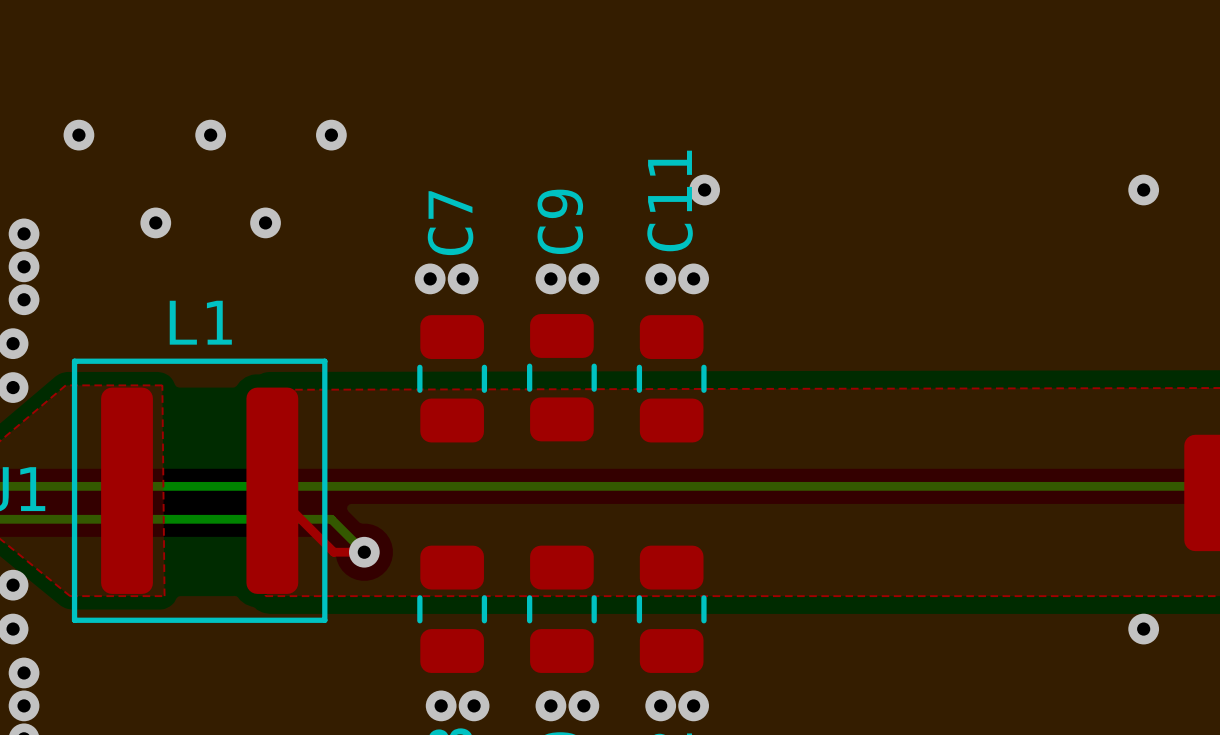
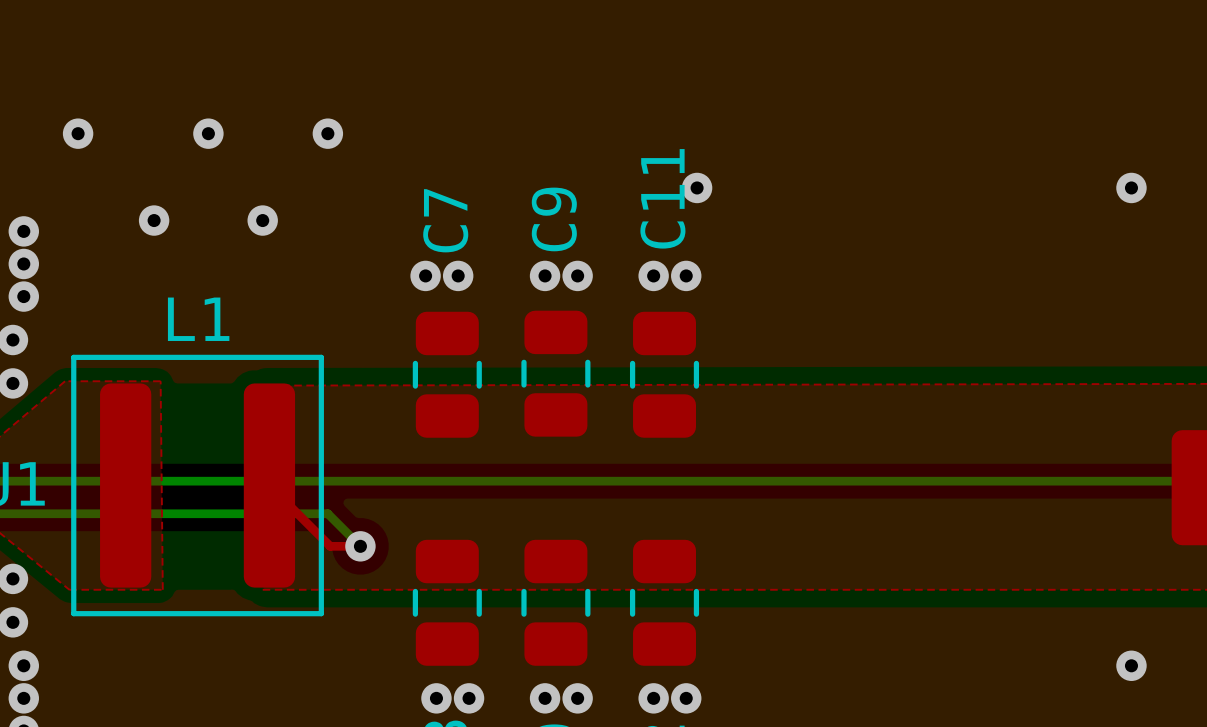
via position: (1143, 629) -> (1131, 665)

